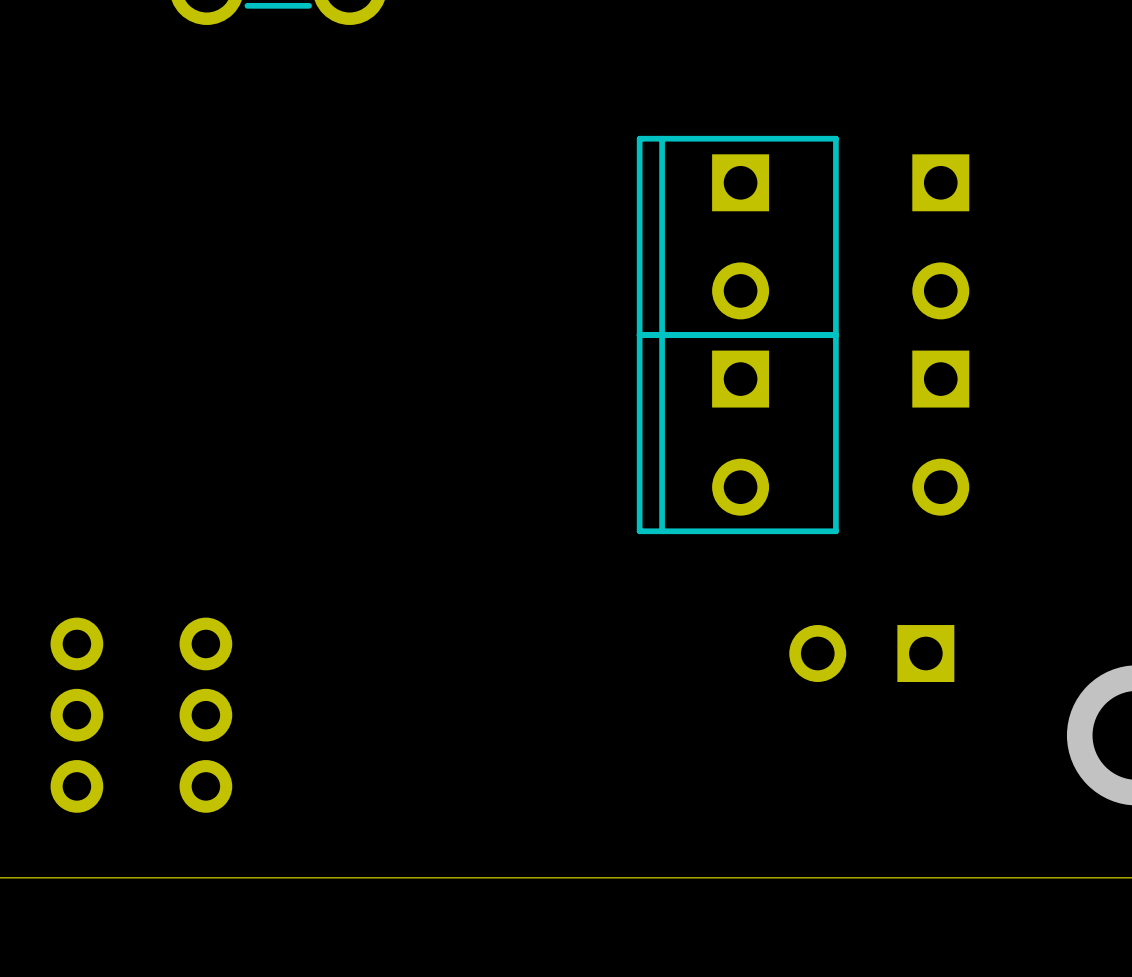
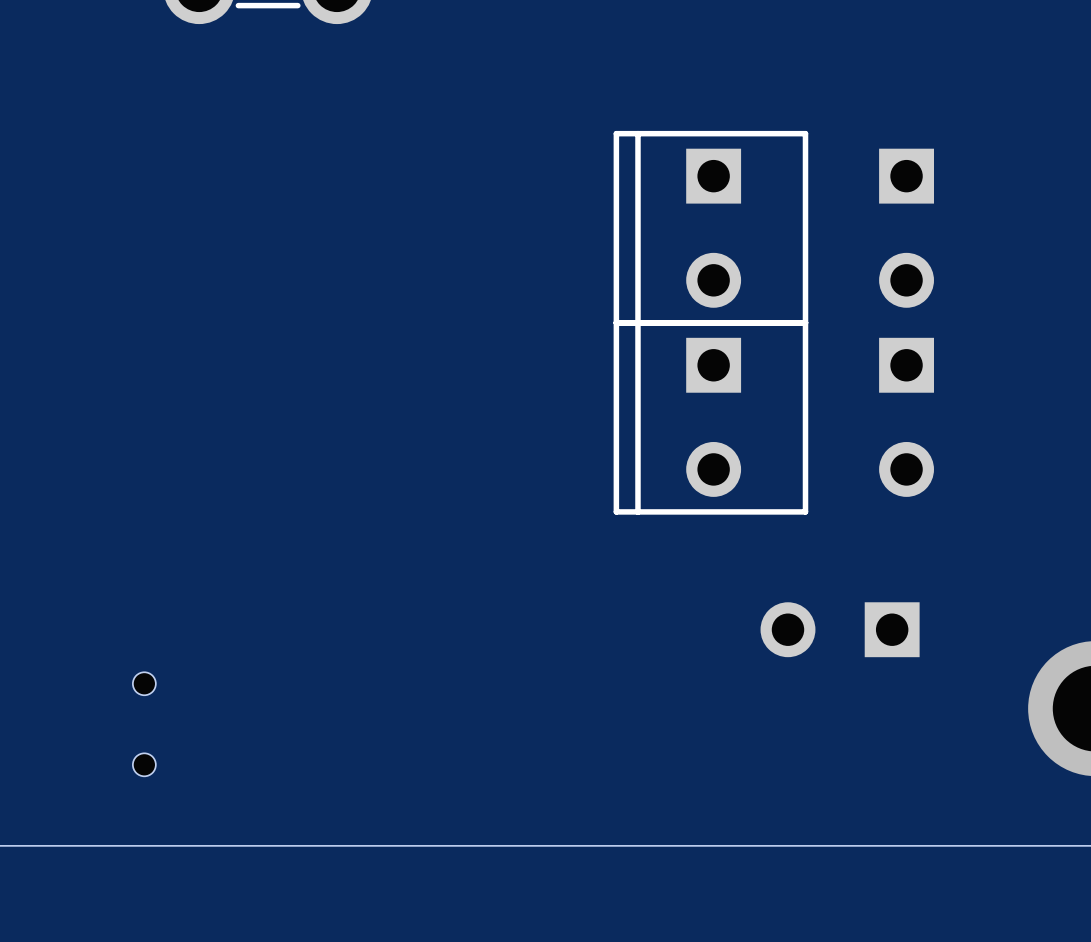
part: (76, 715) -> none
part: (205, 715) -> none
part: none -> (144, 724)

